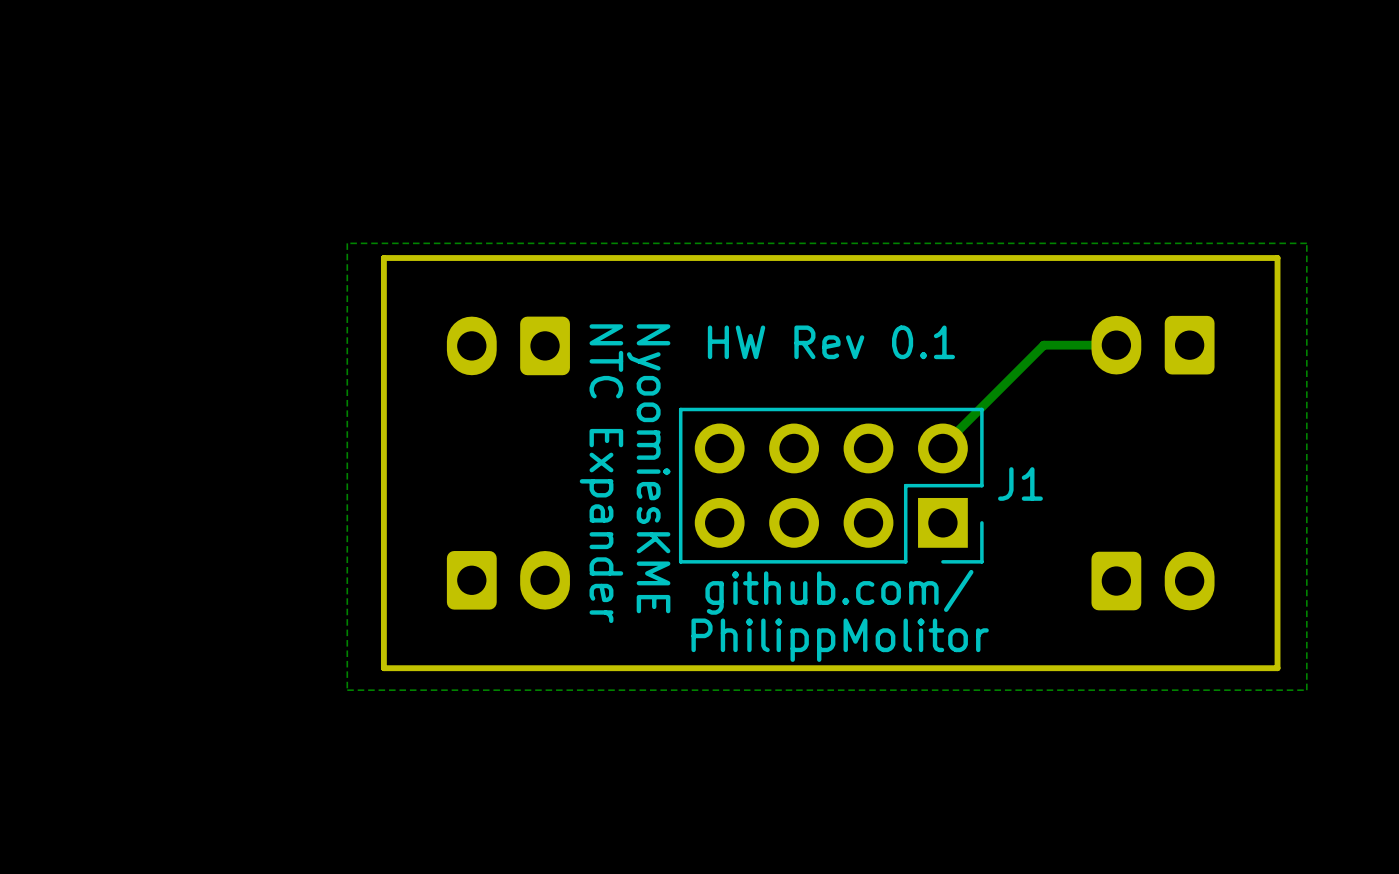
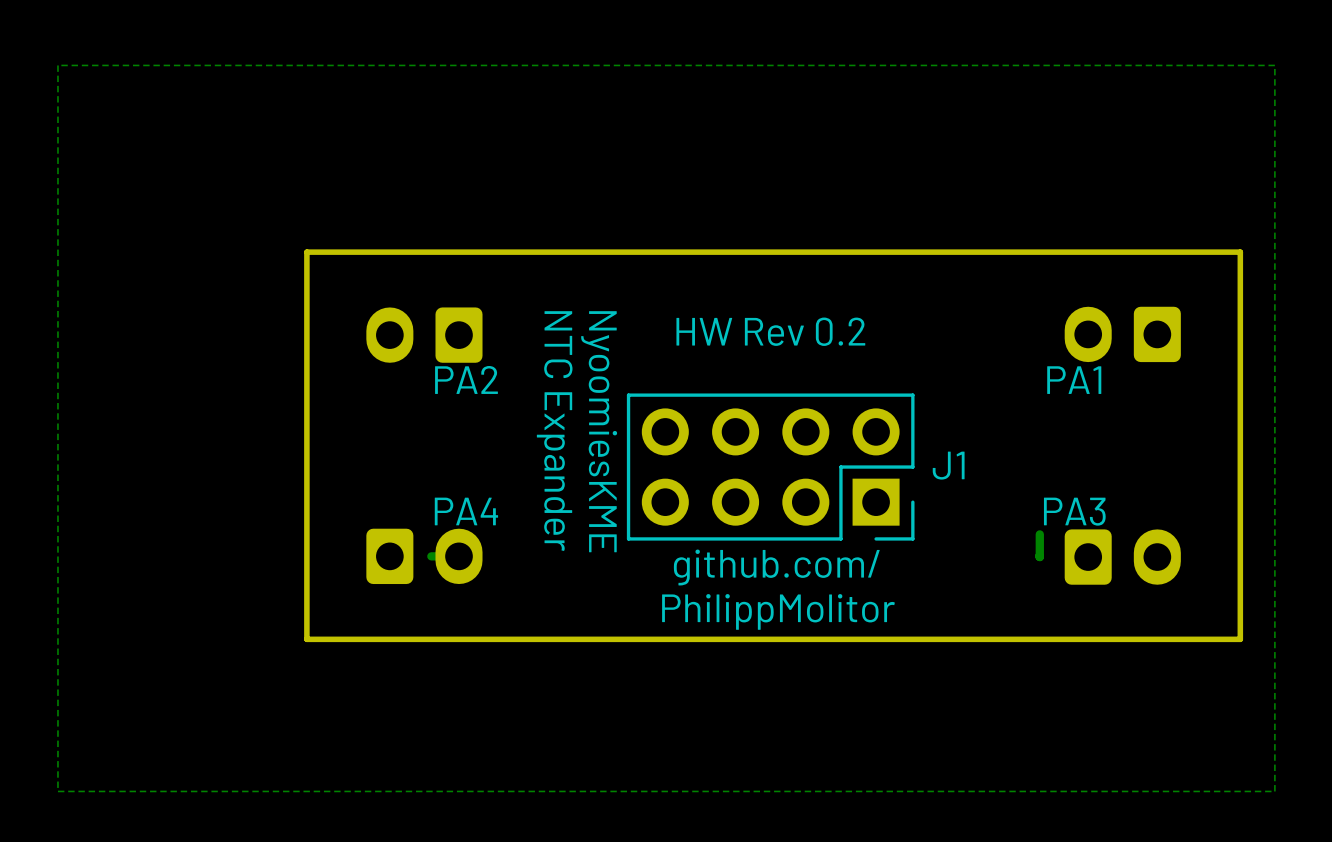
zone outline: none -> (1274, 65) (1274, 791) (57, 791) (57, 65) (1274, 65)
zone outline: (1306, 243) (1306, 690) (347, 690) (347, 243) (1306, 243) -> none
board edge: (383, 258) (383, 668) -> (348, 252) (306, 252) (306, 639) (348, 639)
board edge: (1277, 258) (1277, 668) -> (1191, 252) (1240, 252) (1240, 639) (1191, 639)
text: HW Rev 0.1 (831, 342) -> HW Rev 0.2 (770, 331)
part position: (508, 345) -> (424, 335)
track: (1116, 345) (1043, 345) (942, 446) -> none
part position: (1153, 345) -> (1122, 334)
text: none -> PA2 (466, 379)
text: none -> PA1 (1074, 380)
text: none -> PA4 (466, 511)
text: none -> PA3 (1074, 511)
part position: (508, 580) -> (424, 556)
part position: (1153, 581) -> (1122, 557)

